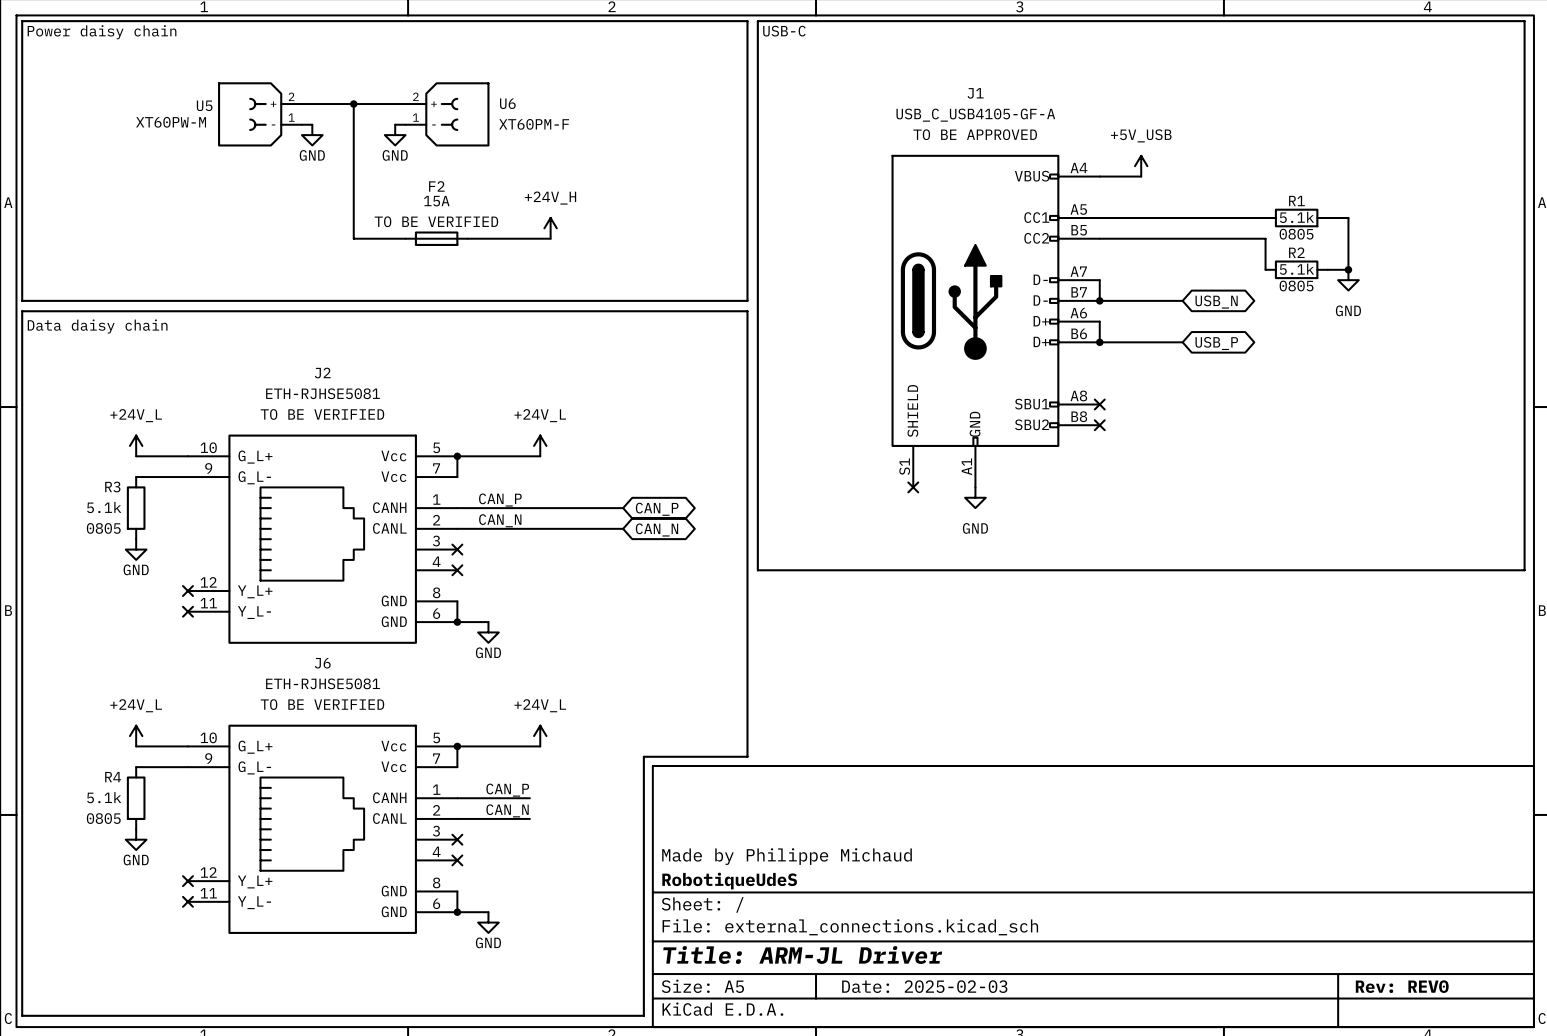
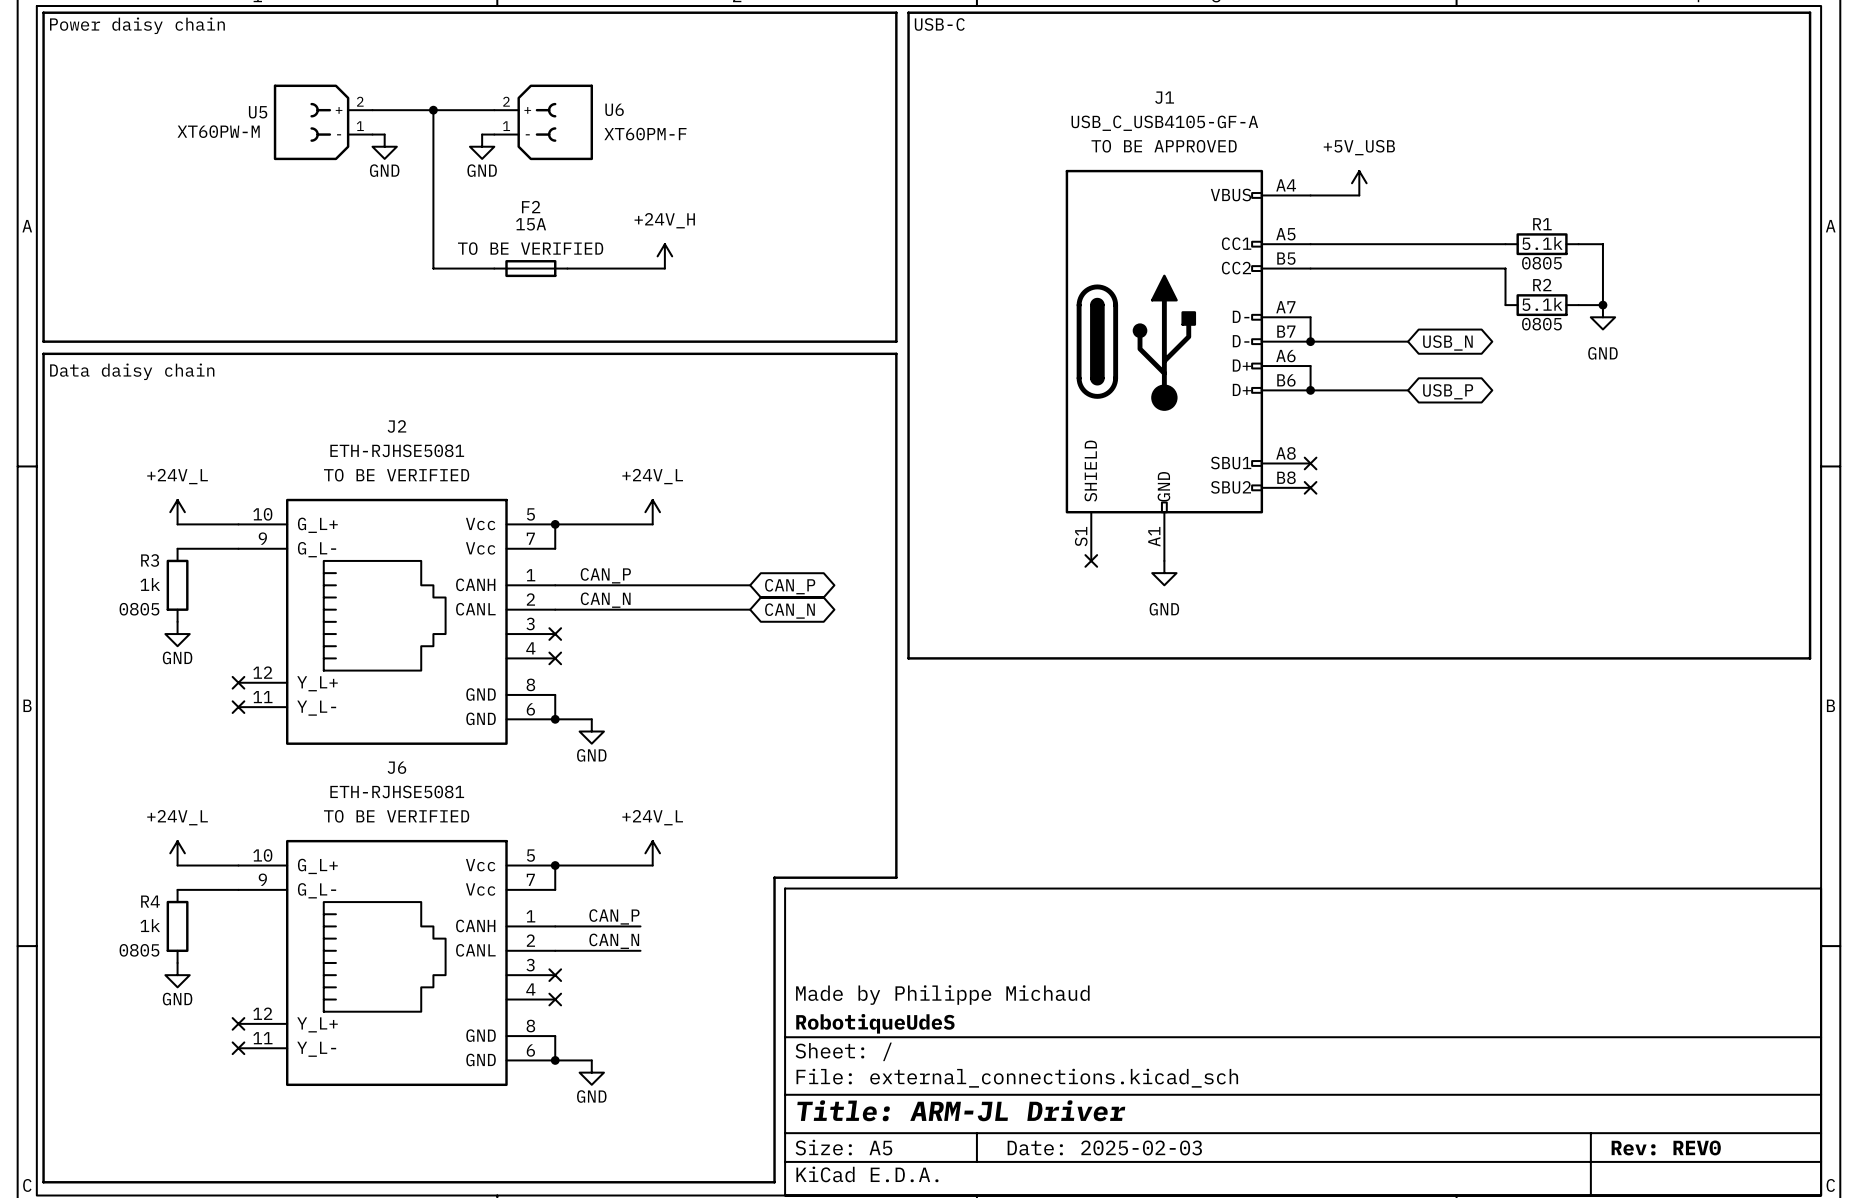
R3 value: 5.1k (104, 507) -> 1k (150, 584)
R4 value: 5.1k (104, 797) -> 1k (150, 925)

